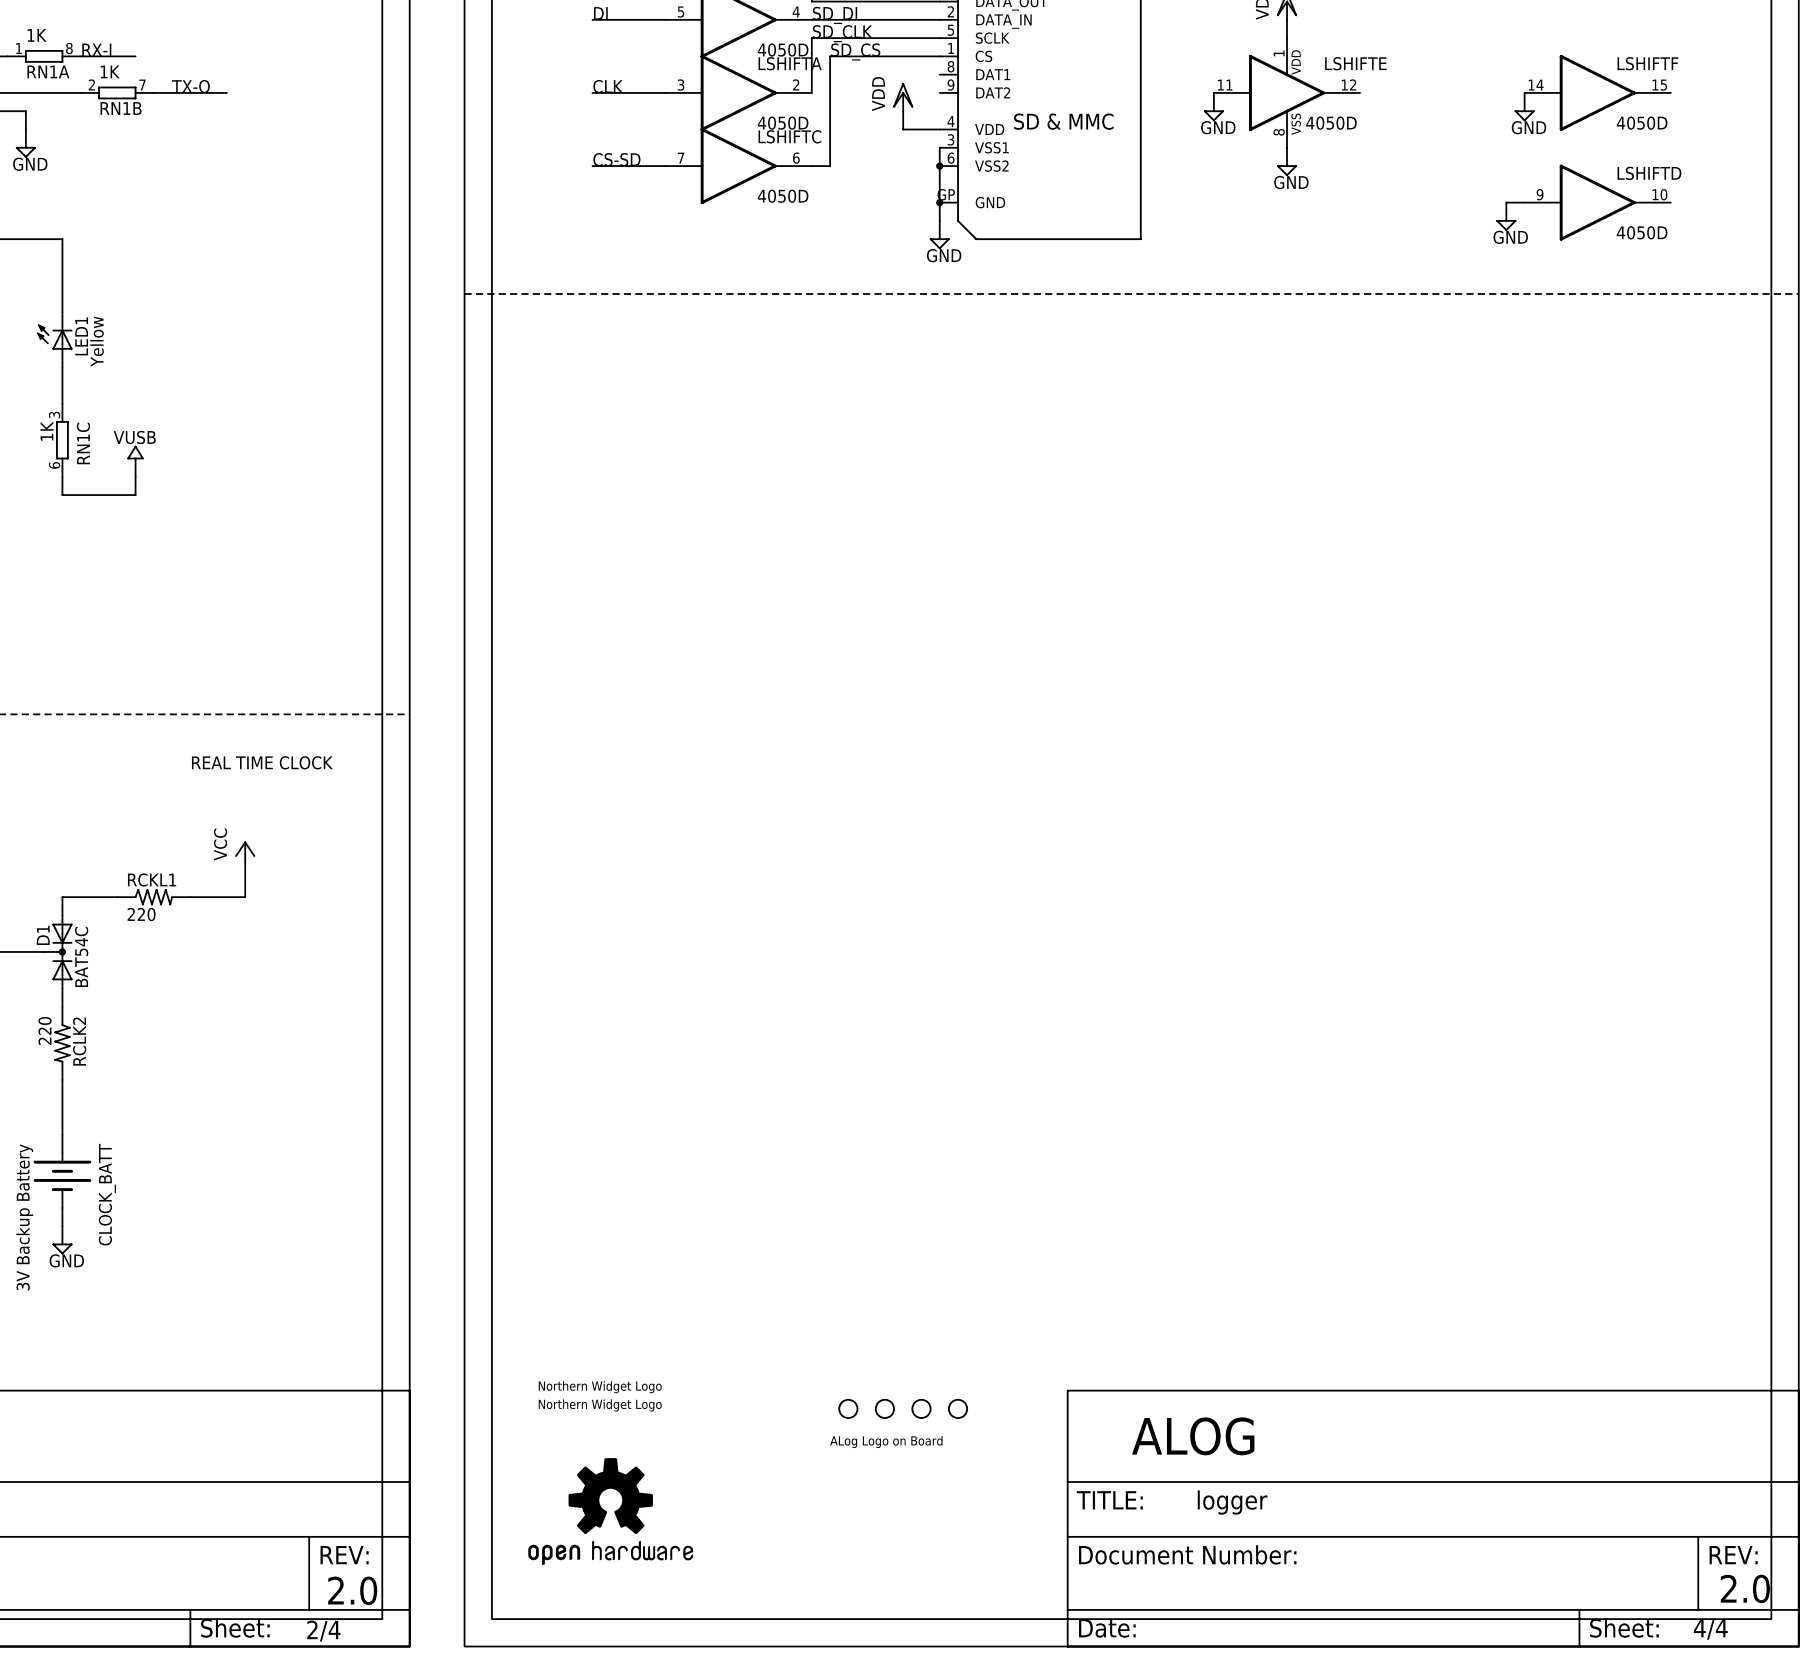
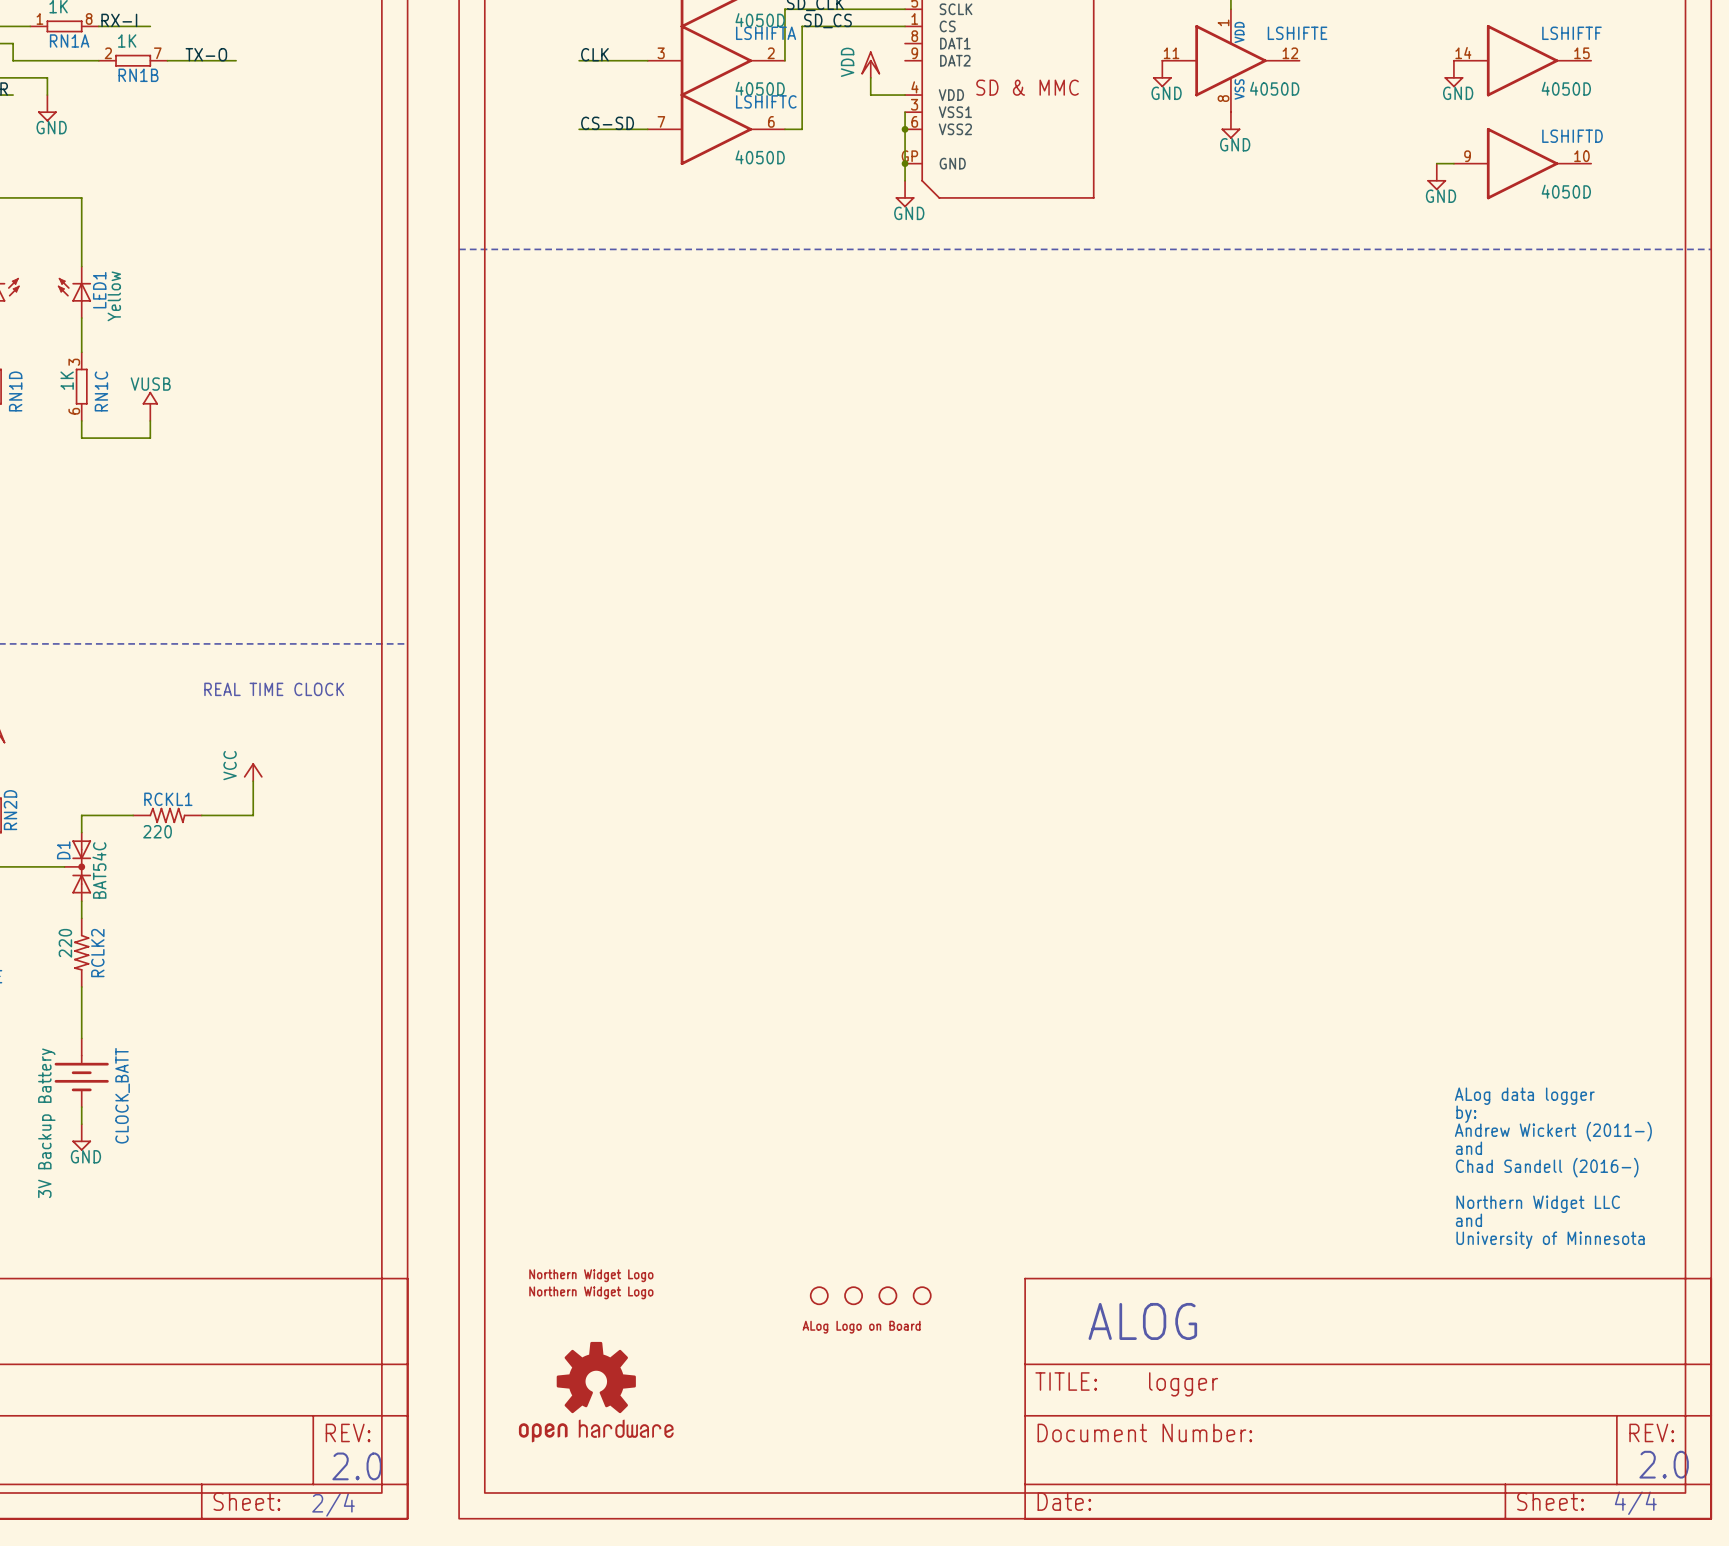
text: none -> ALog data logger (1524, 1096)
text: none -> by: (1466, 1114)
text: none -> Andrew Wickert (2011-) (1553, 1131)
text: none -> and (1468, 1148)
text: none -> Chad Sandell (2016-) (1547, 1167)
text: none -> Northern Widget LLC (1538, 1204)
text: none -> and (1468, 1220)
text: none -> University of Minnesota (1550, 1240)

